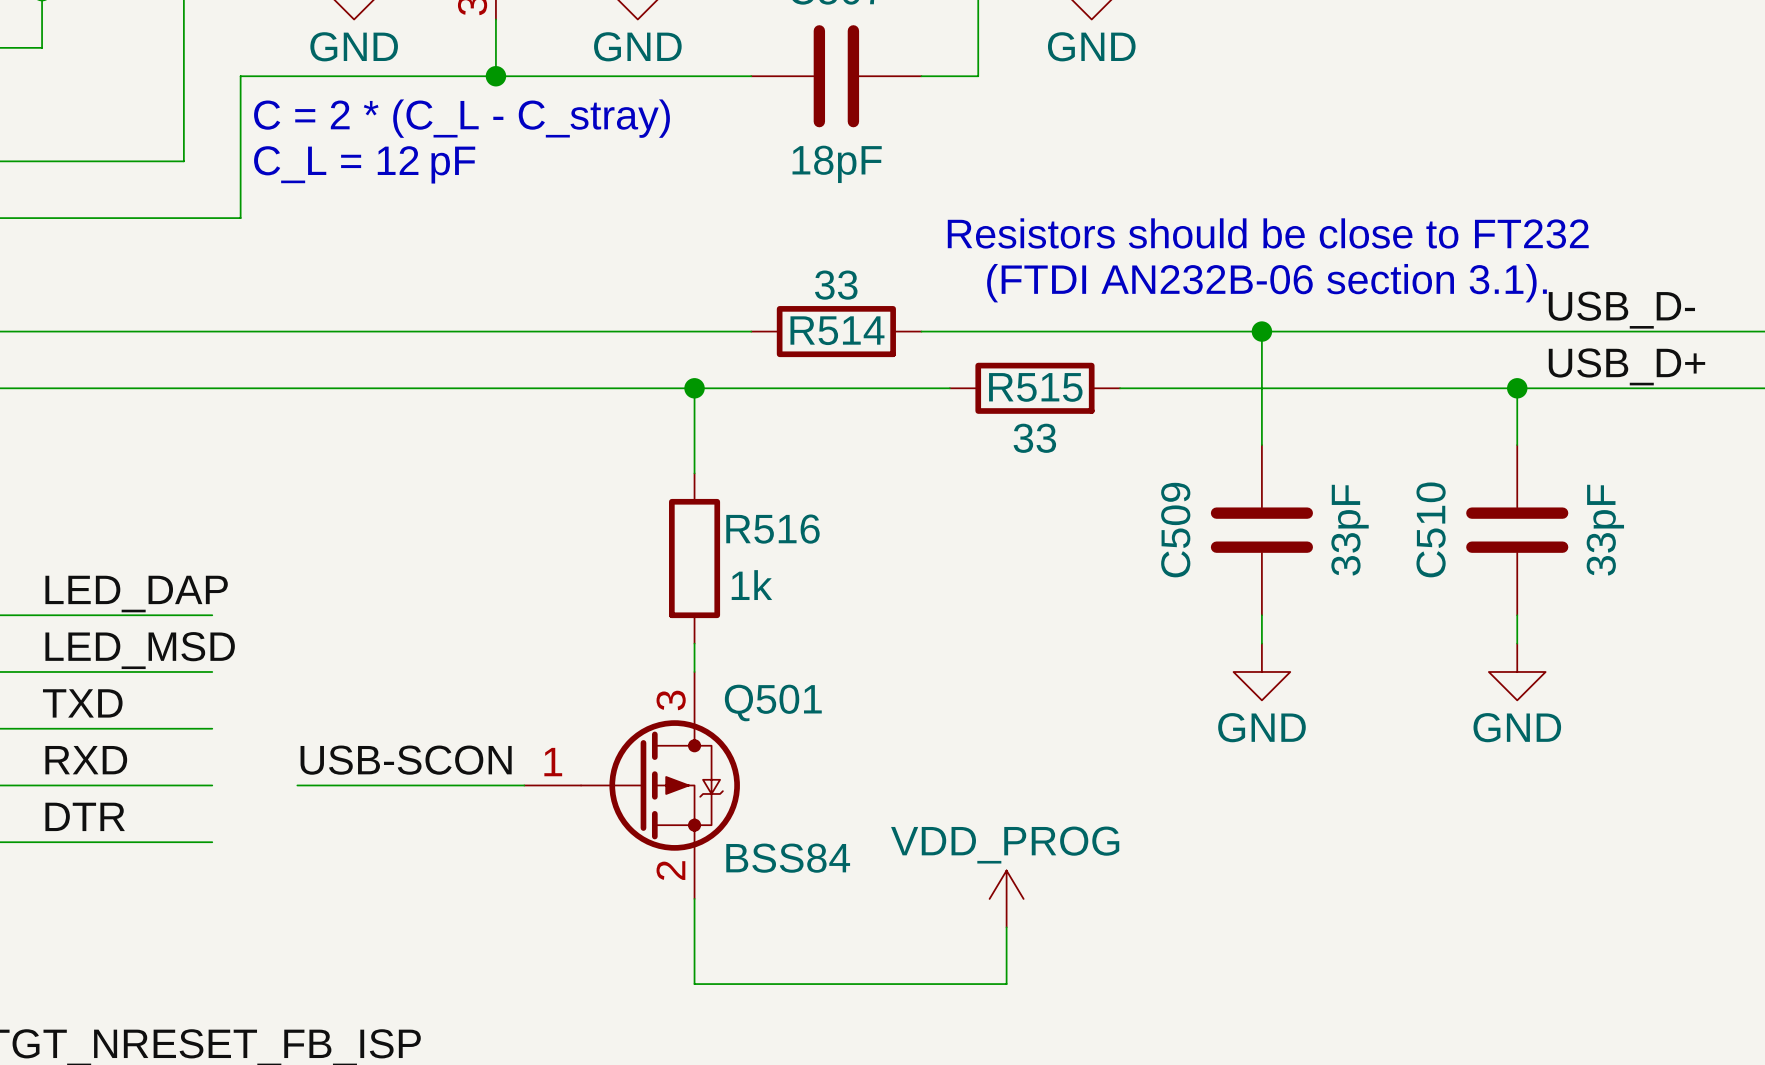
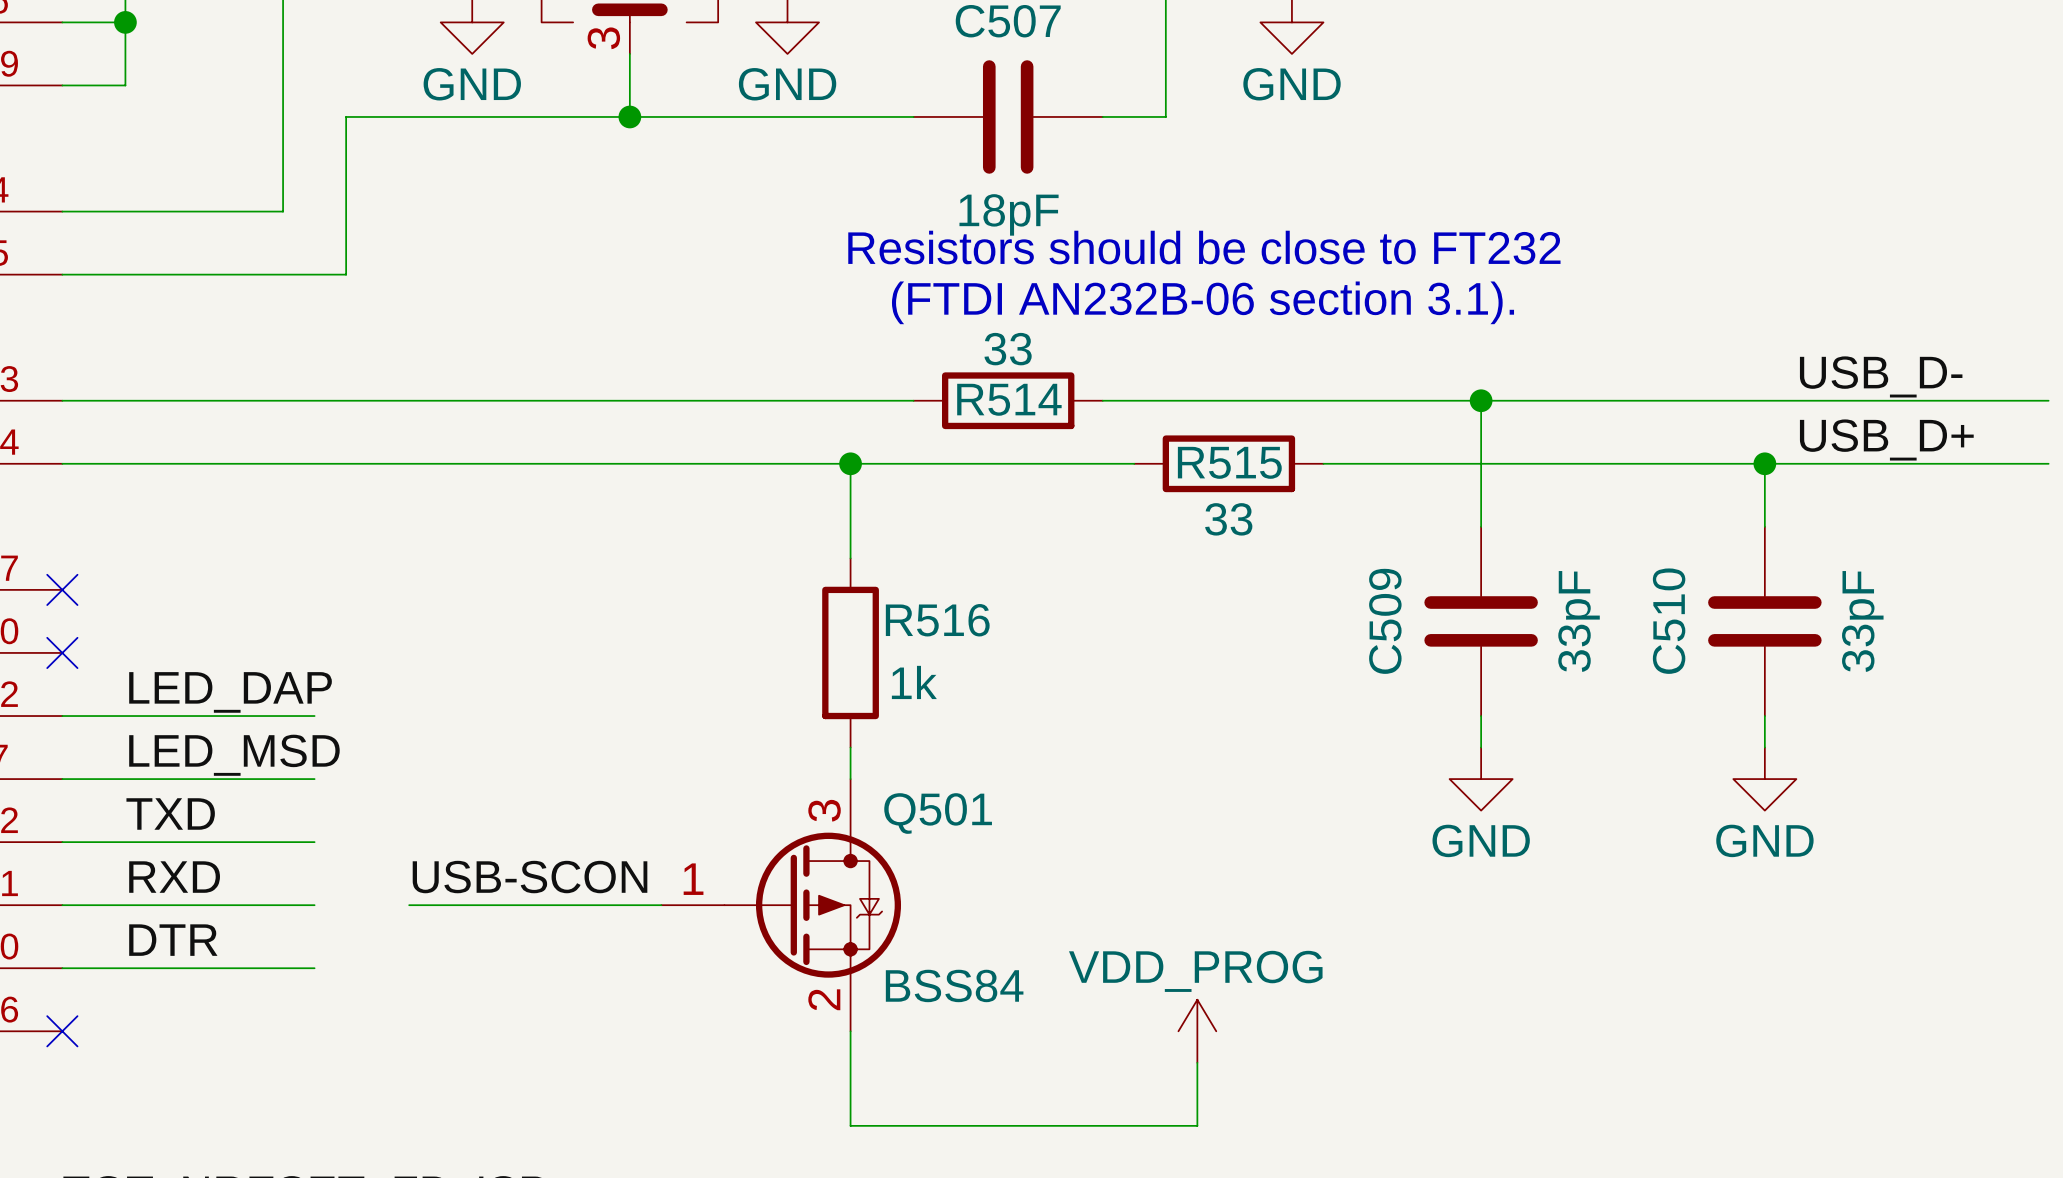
text: C = 2 * (C_L - C_stray) (461, 118) -> none
text: C_L = 12 pF (364, 164) -> none
text position: Resistors should be close to FT232 (1268, 233) -> Resistors should be close to FT232 (1204, 247)
text position: (FTDI AN232B-06 section 3.1). (1266, 283) -> (FTDI AN232B-06 section 3.1). (1203, 302)

